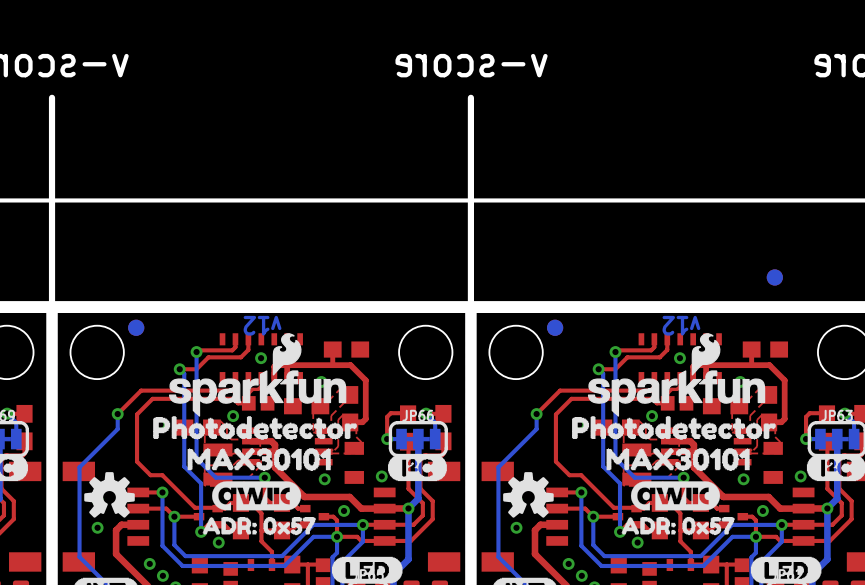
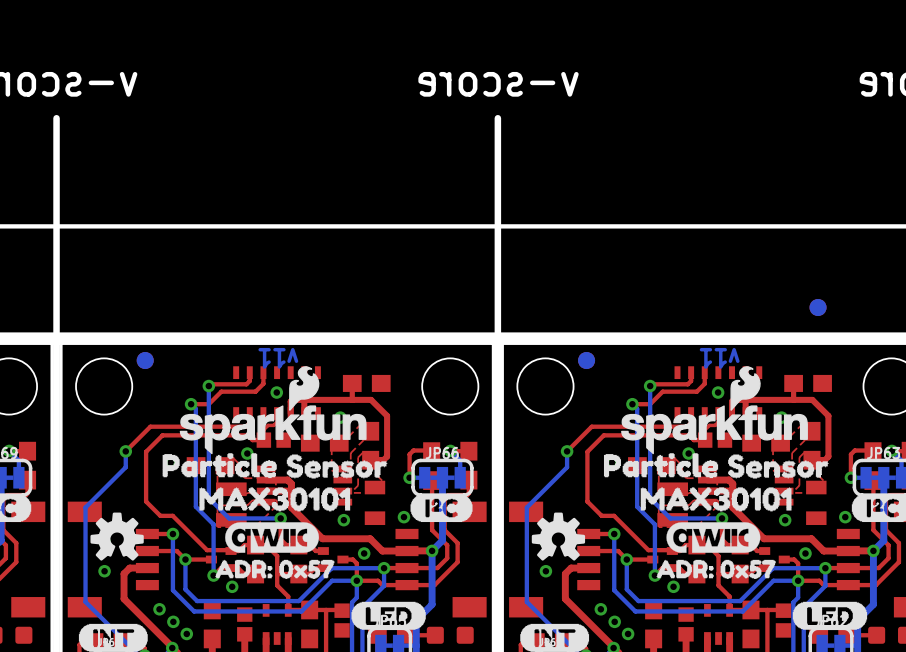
text: v12 (262, 325) -> v11 (278, 358)
text: v12 (681, 325) -> v11 (719, 358)
drawing: none -> [162, 453, 388, 479]
drawing: none -> [603, 453, 829, 479]
drawing: [153, 416, 357, 440] -> none
drawing: [572, 416, 776, 440] -> none

